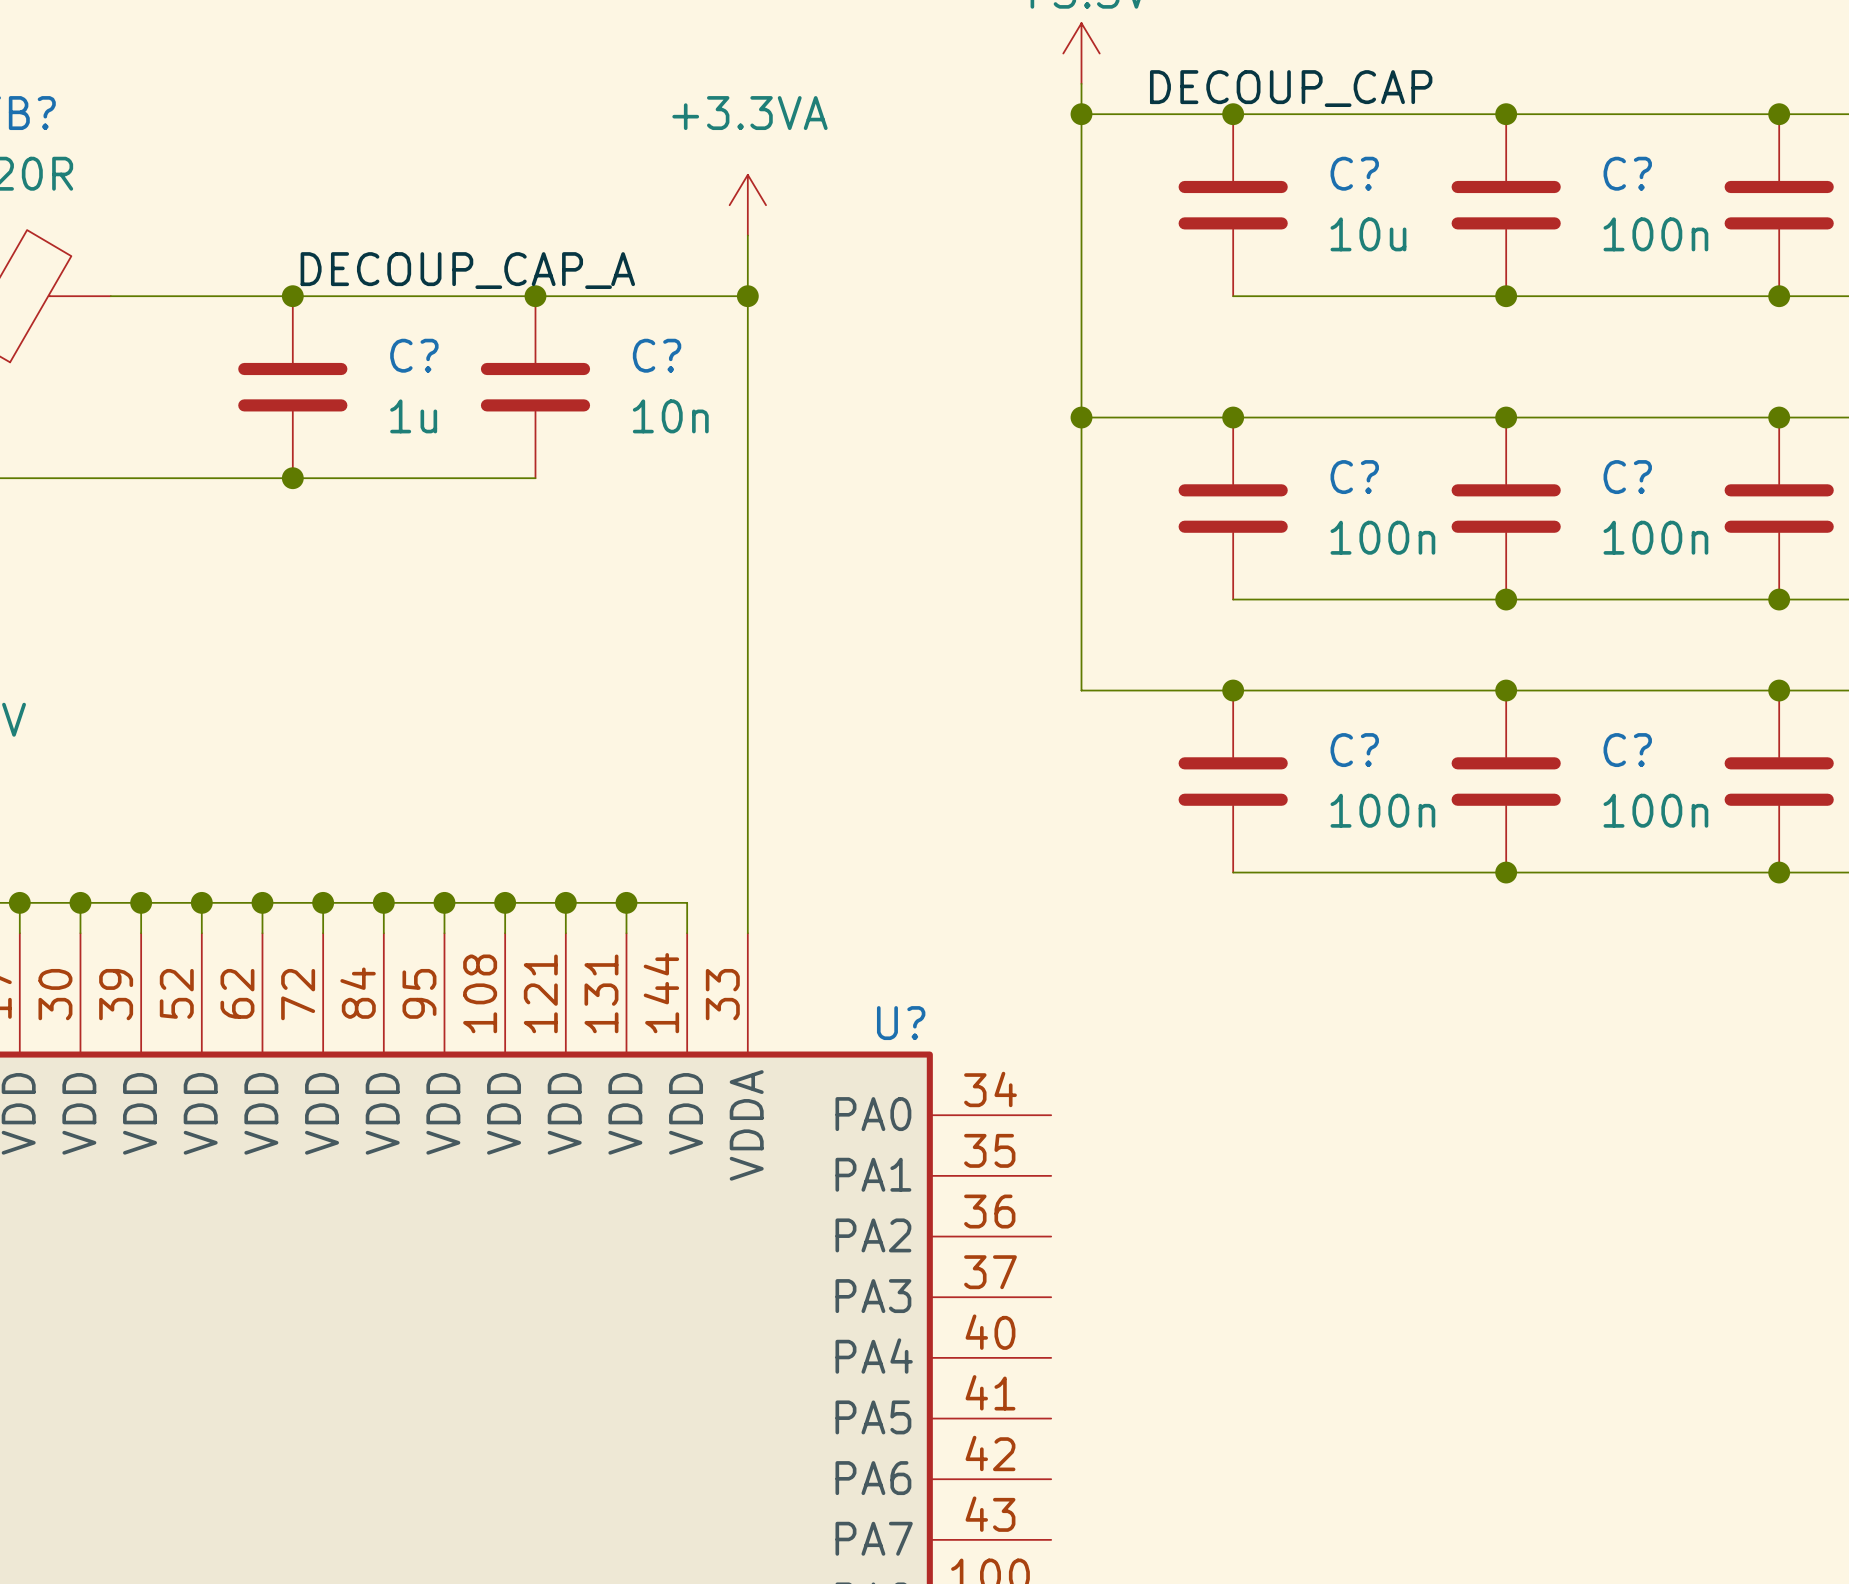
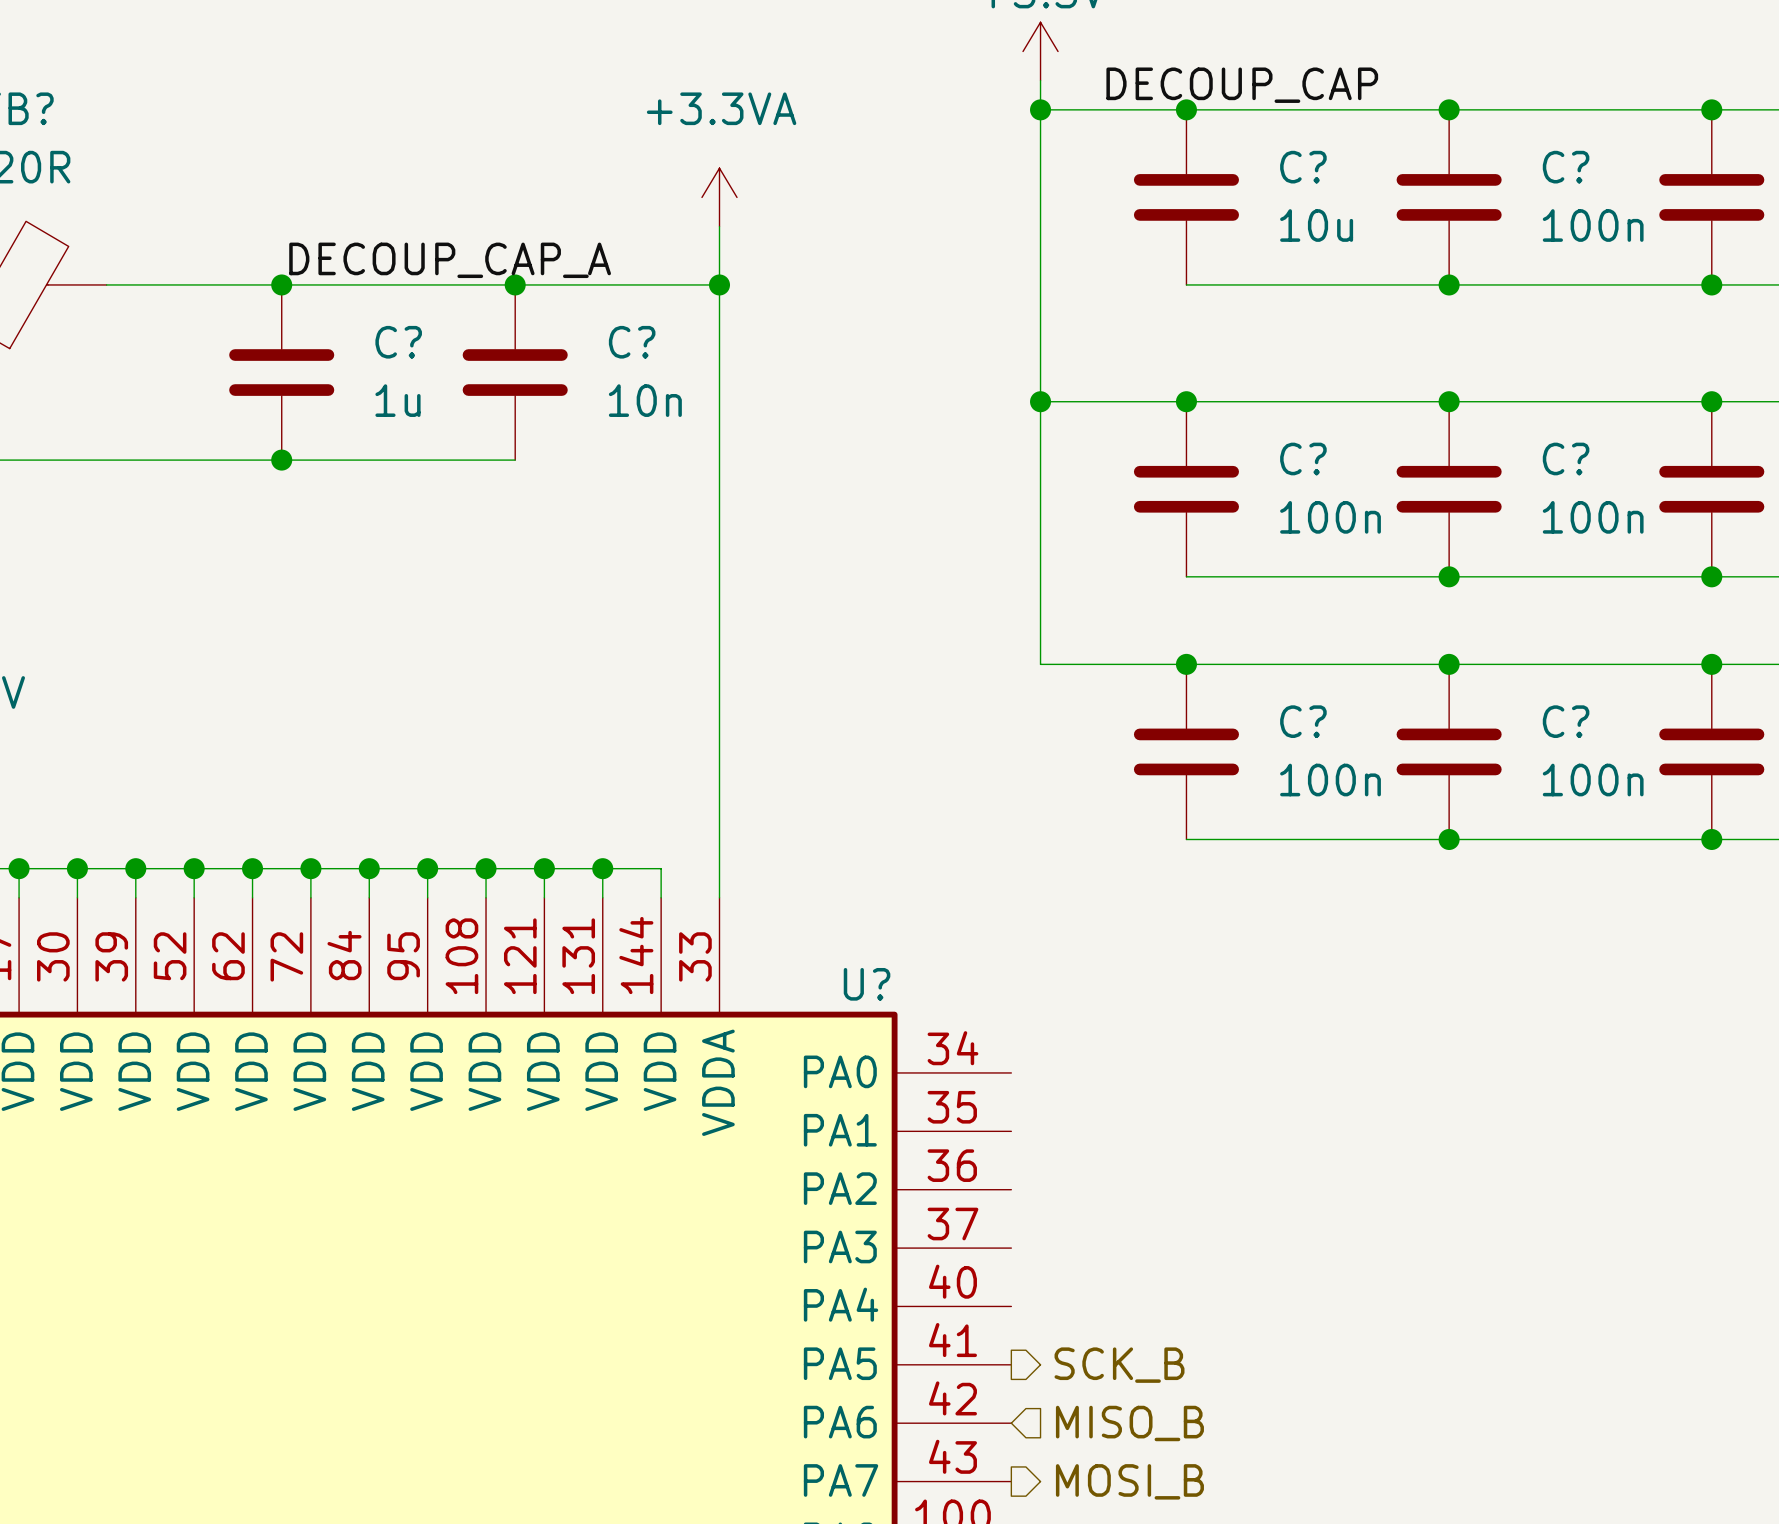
hierarchical label: none -> SCK_B (1119, 1365)
hierarchical label: none -> MISO_B (1129, 1423)
hierarchical label: none -> MOSI_B (1129, 1481)

